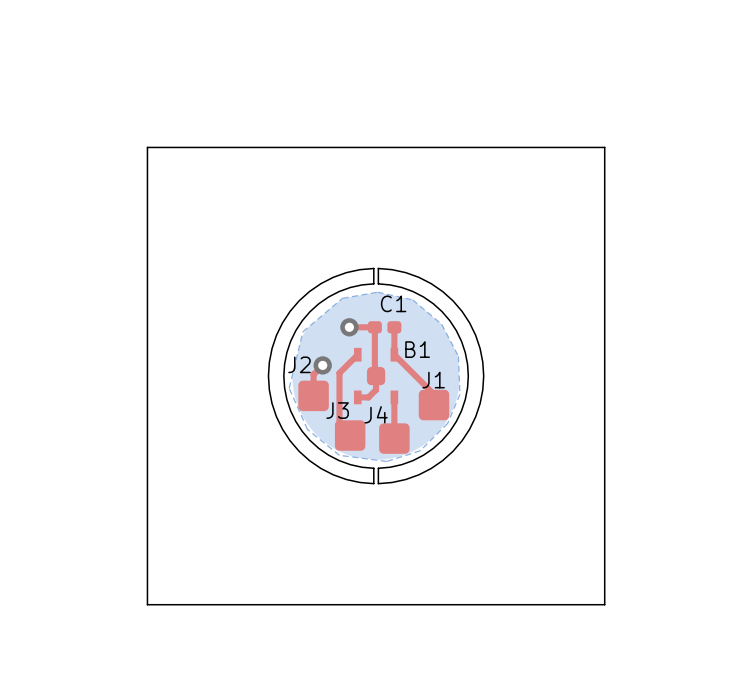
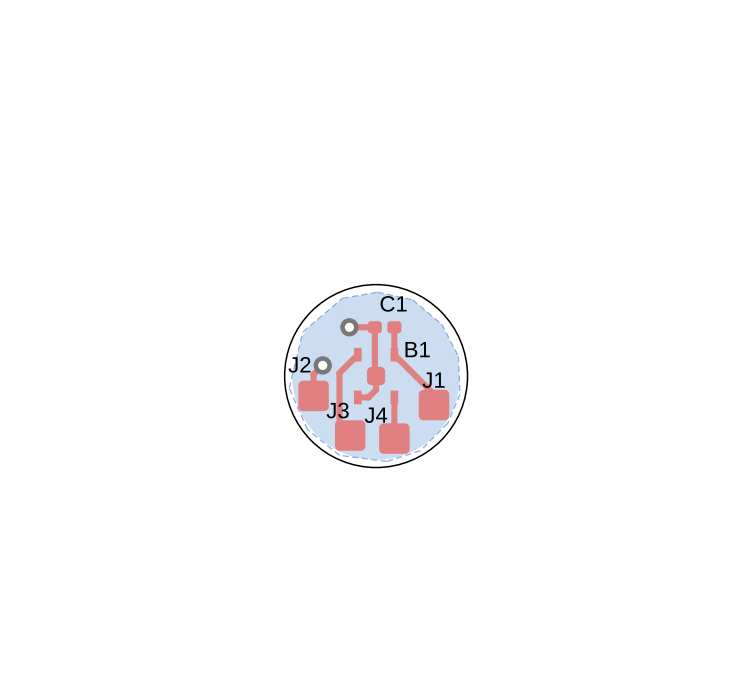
board edge: (147, 147) (604, 147) (604, 604) (147, 604) (147, 147) -> none
round board edge: none -> [283, 283, 469, 469]
board edge: (373, 483) (373, 468) (361, 467) (339, 460) (318, 448) (302, 431) (290, 410) (286, 399) (283, 376) (286, 352) (295, 330) (302, 320) (310, 311) (328, 296) (350, 287) (373, 283) (373, 268) (346, 272) (333, 277) (309, 291) (299, 300) (290, 311) (276, 335) (272, 348) (268, 376) (269, 389) (276, 416) (290, 440) (299, 451) (320, 468) (333, 474) (346, 479) (373, 483) -> none
board edge: (378, 483) (378, 468) (390, 467) (412, 460) (433, 448) (449, 431) (461, 410) (467, 387) (468, 376) (465, 352) (456, 330) (449, 320) (433, 303) (412, 291) (401, 287) (378, 283) (378, 268) (392, 269) (418, 277) (431, 283) (452, 300) (469, 322) (475, 335) (480, 348) (483, 376) (480, 403) (475, 416) (462, 440) (452, 451) (442, 460) (418, 474) (392, 482) (378, 483) -> none

